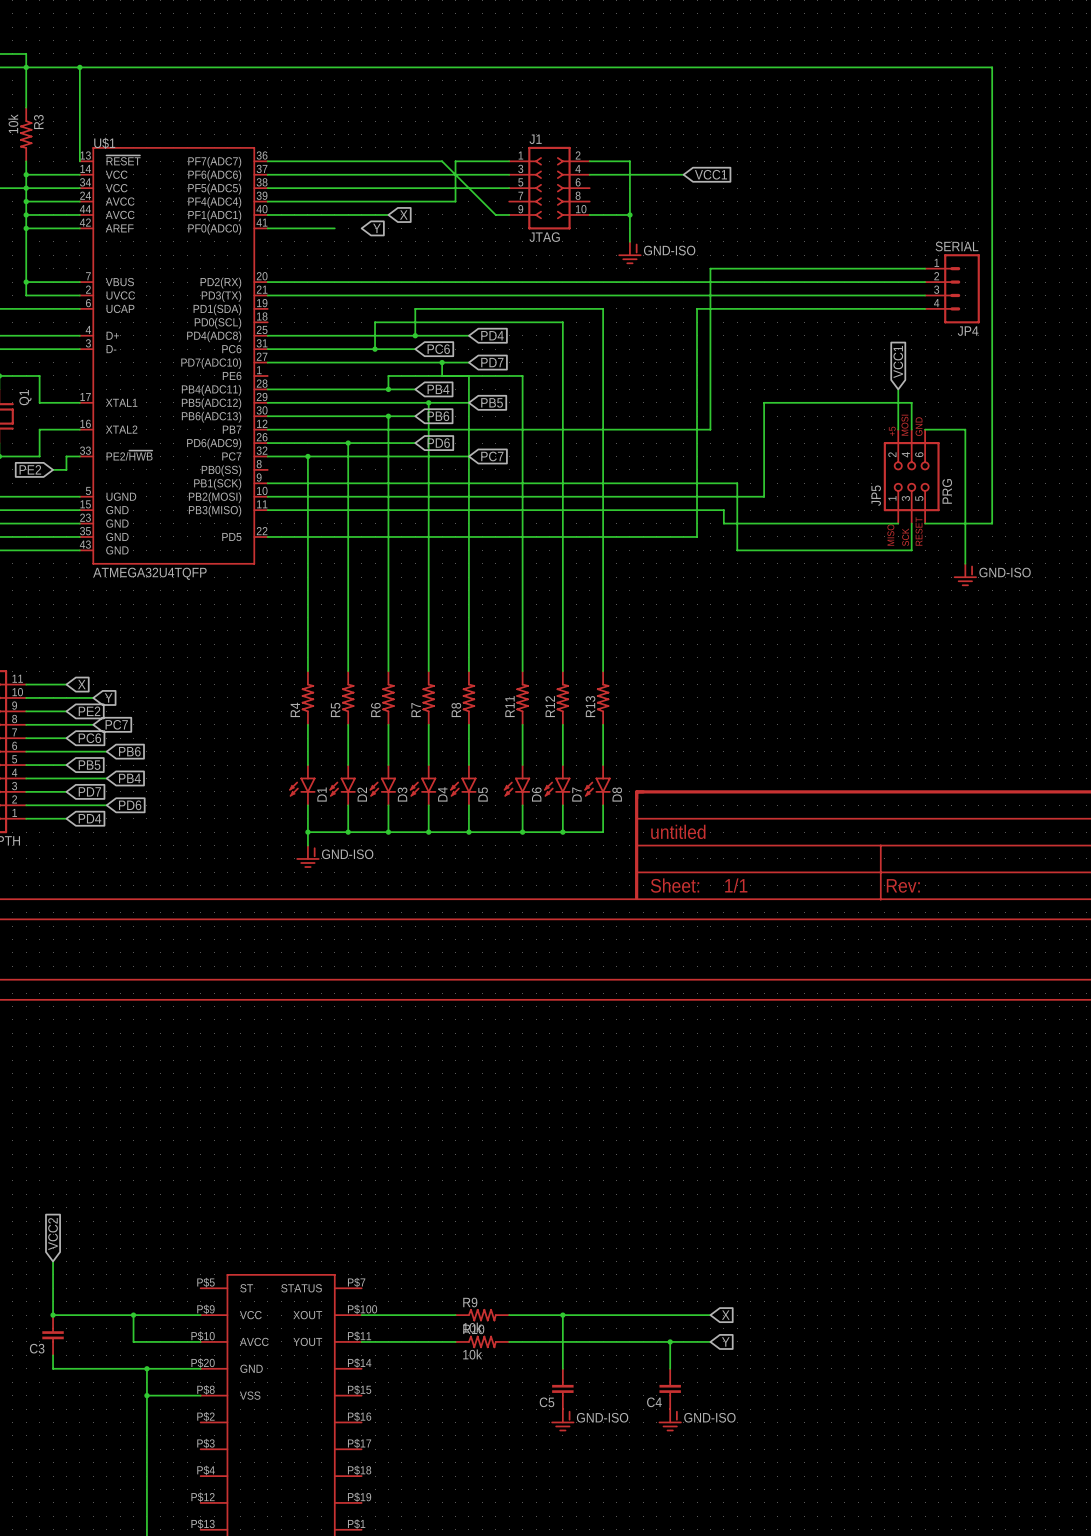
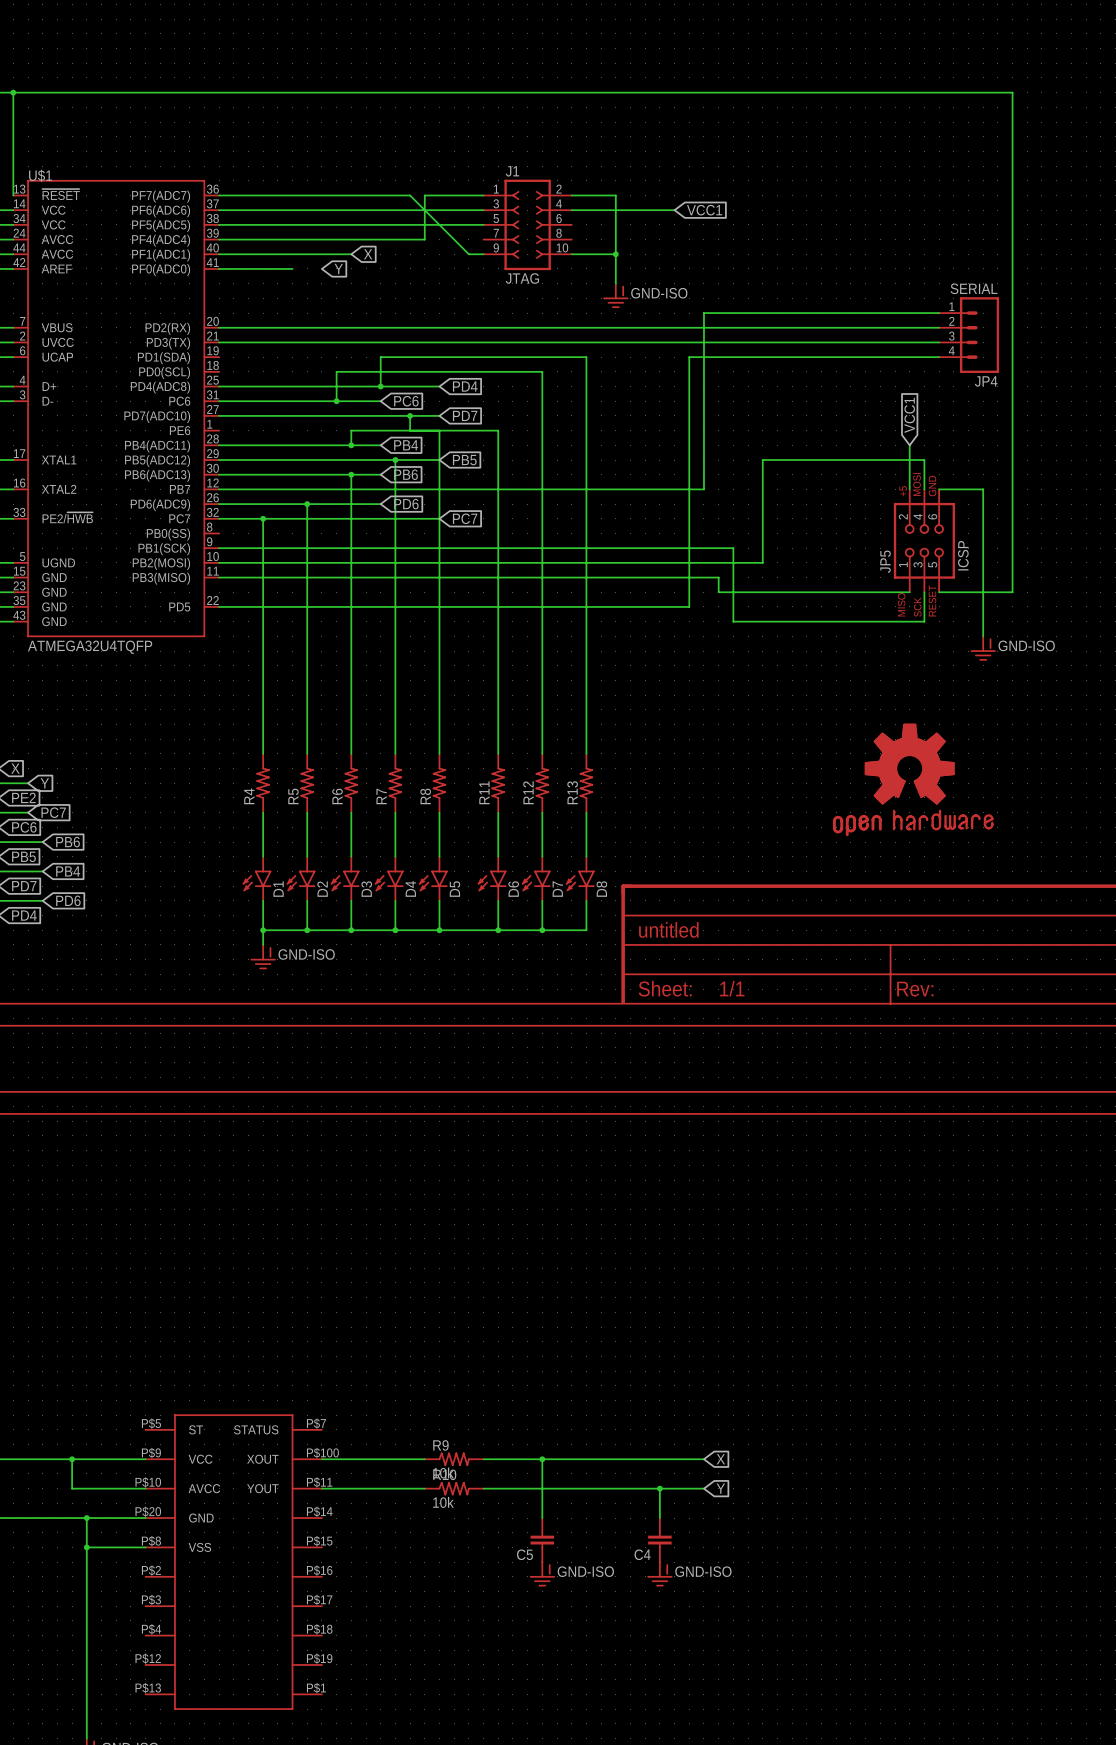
JP5 value: PRG (947, 491) -> ICSP (963, 555)
part: none -> (913, 779)

